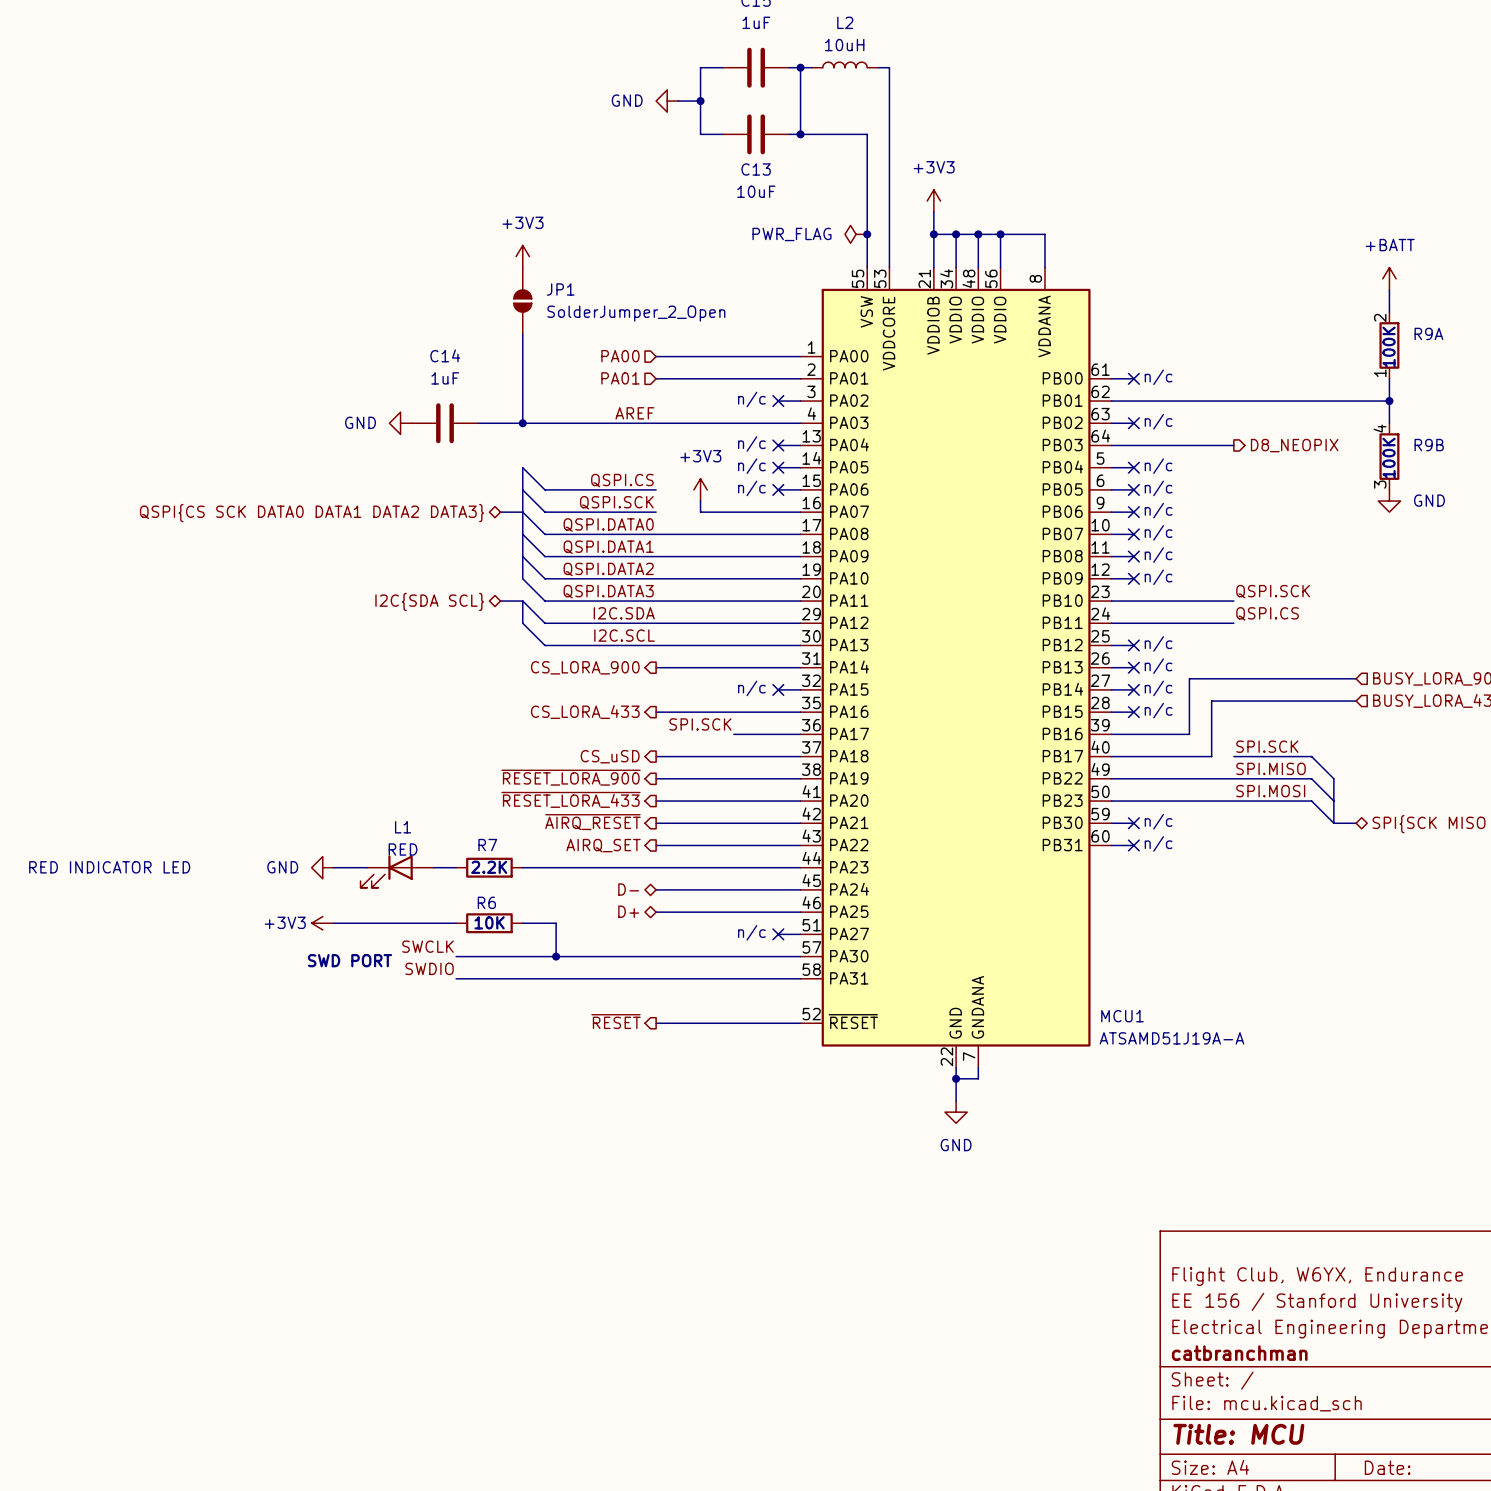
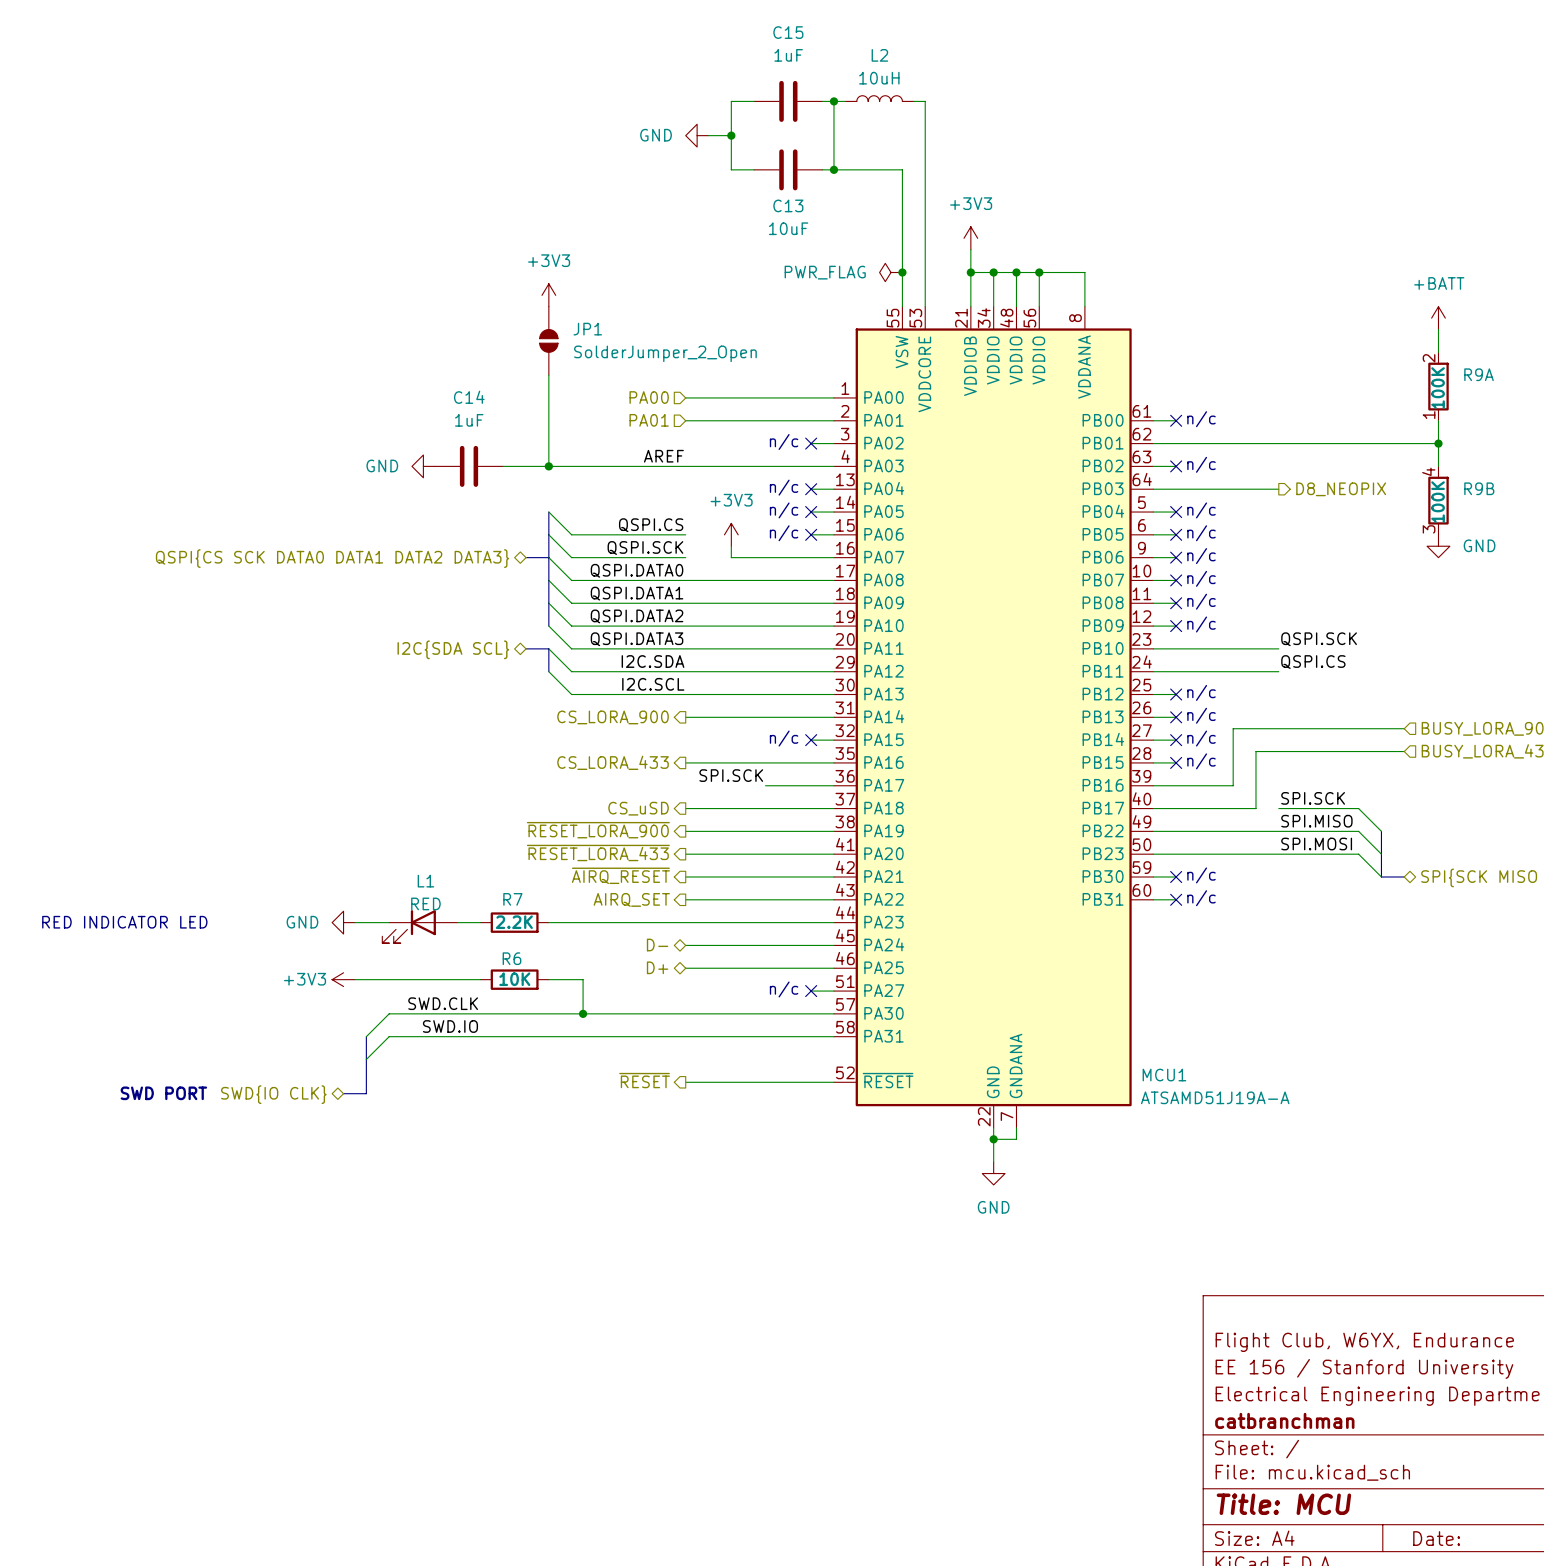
label: SWCLK (427, 946) -> SWD.CLK (443, 1003)
wire: none -> (480, 1013) (389, 1013) (366, 1036)
text position: SWD PORT (349, 960) -> SWD PORT (163, 1093)
label: SWDIO (429, 968) -> SWD.IO (450, 1026)
bus: none -> (366, 1036) (366, 1093) (343, 1093)
wire: none -> (480, 1036) (389, 1036) (366, 1059)
hierarchical label: none -> SWD{IO CLK} (273, 1094)

